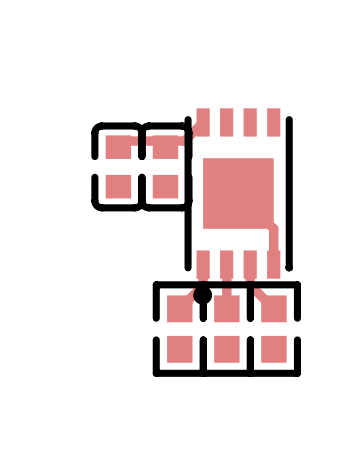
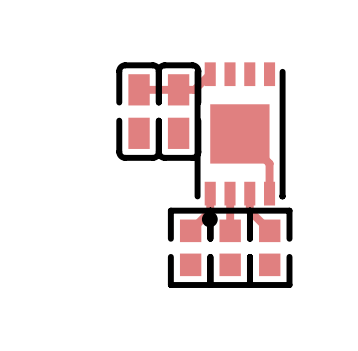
part footprint: [91, 122, 146, 212] -> [116, 62, 162, 161]
part footprint: [138, 122, 193, 212] -> [155, 62, 202, 161]

